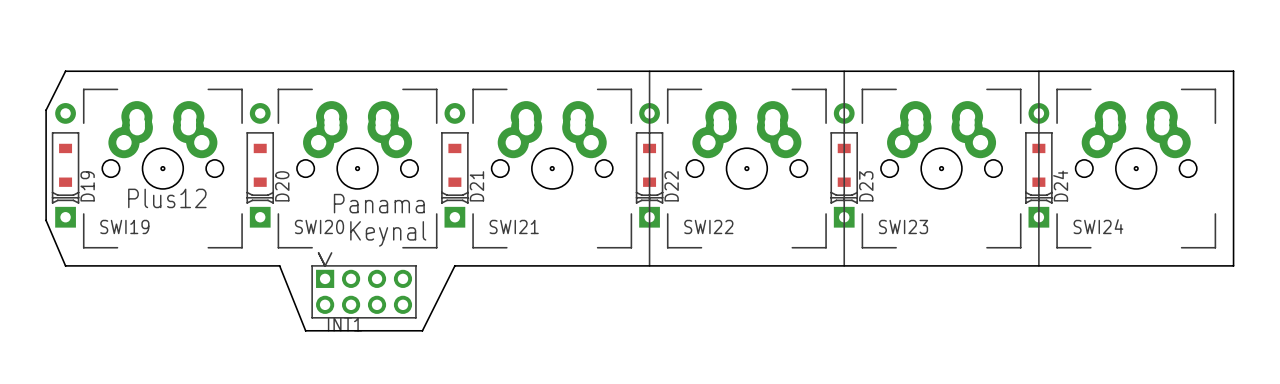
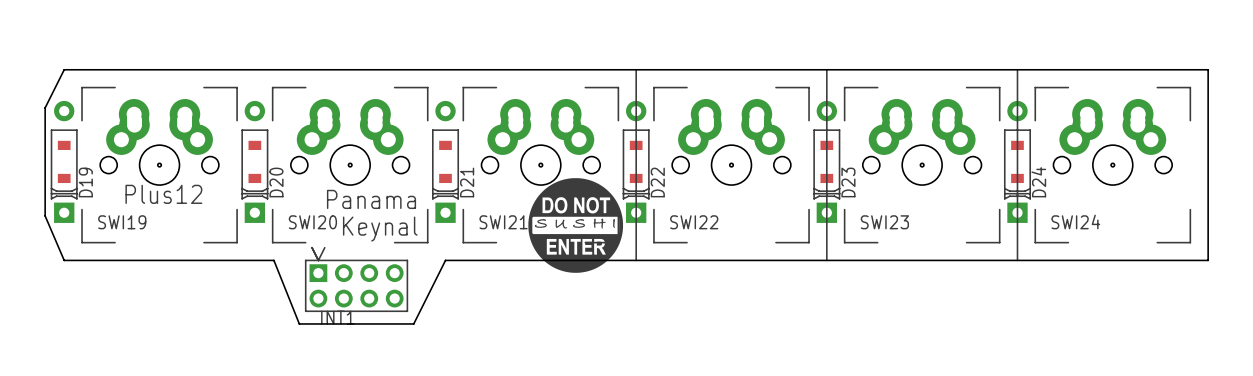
drawing: none -> [528, 178, 624, 273]

